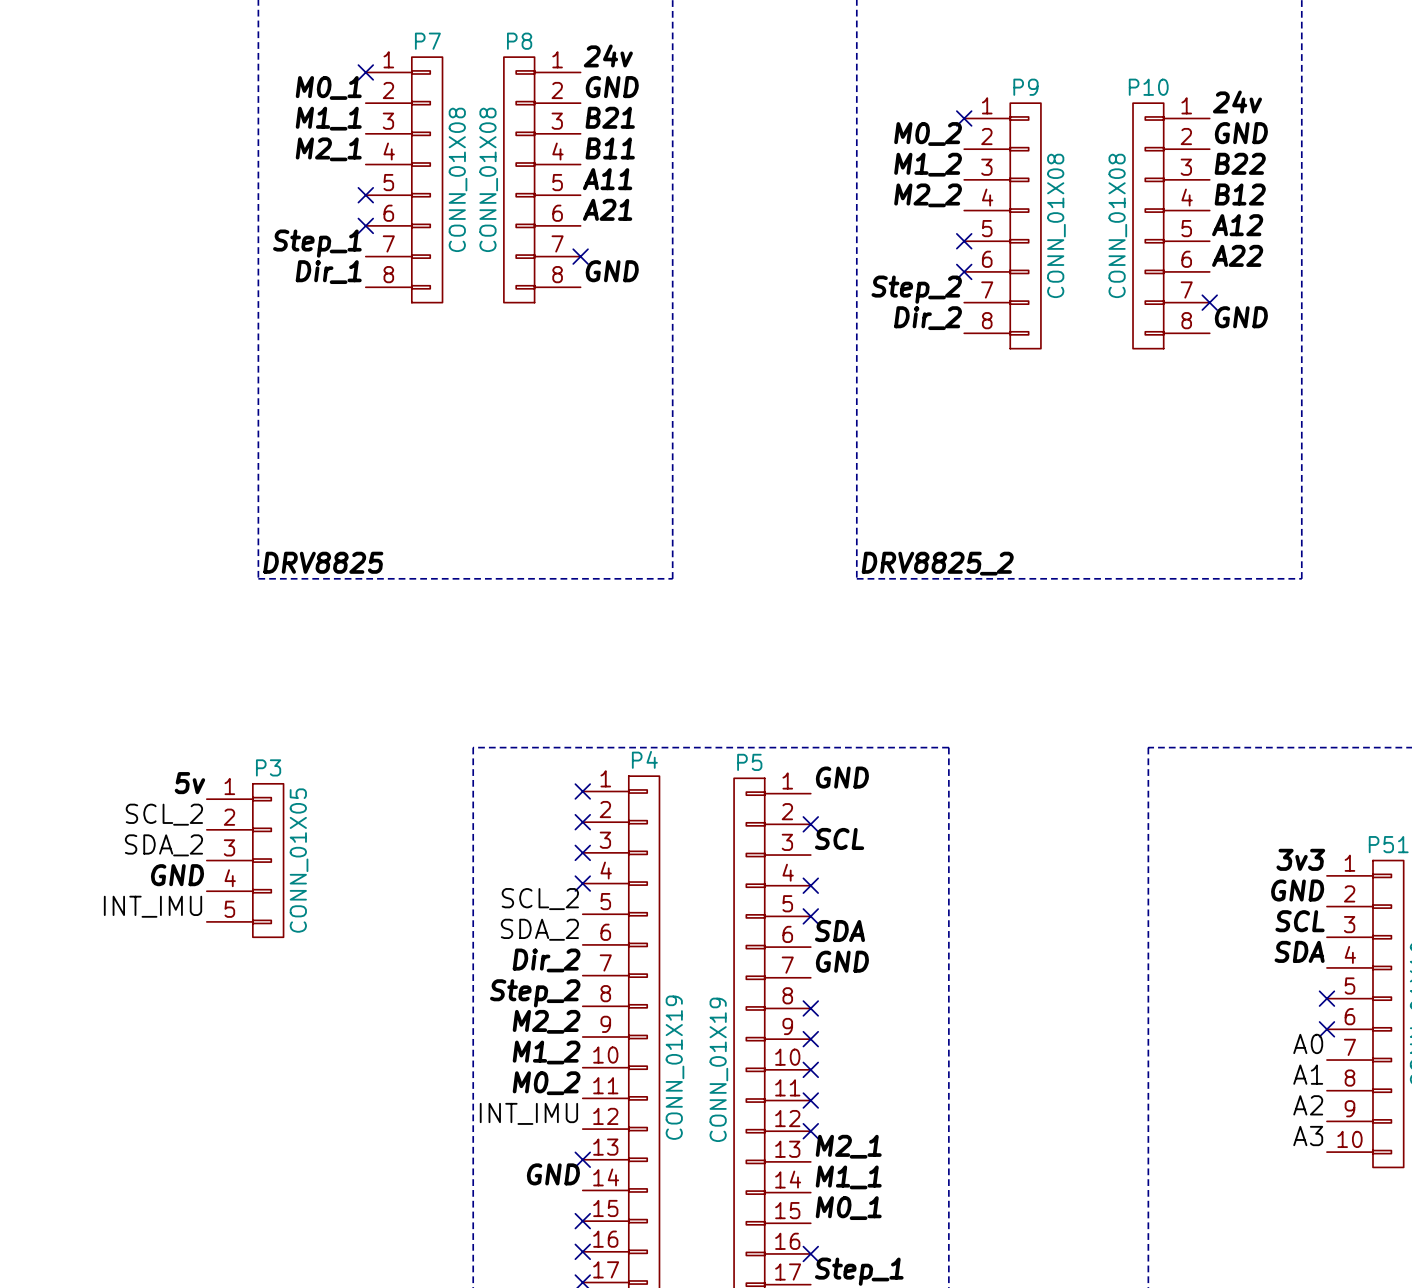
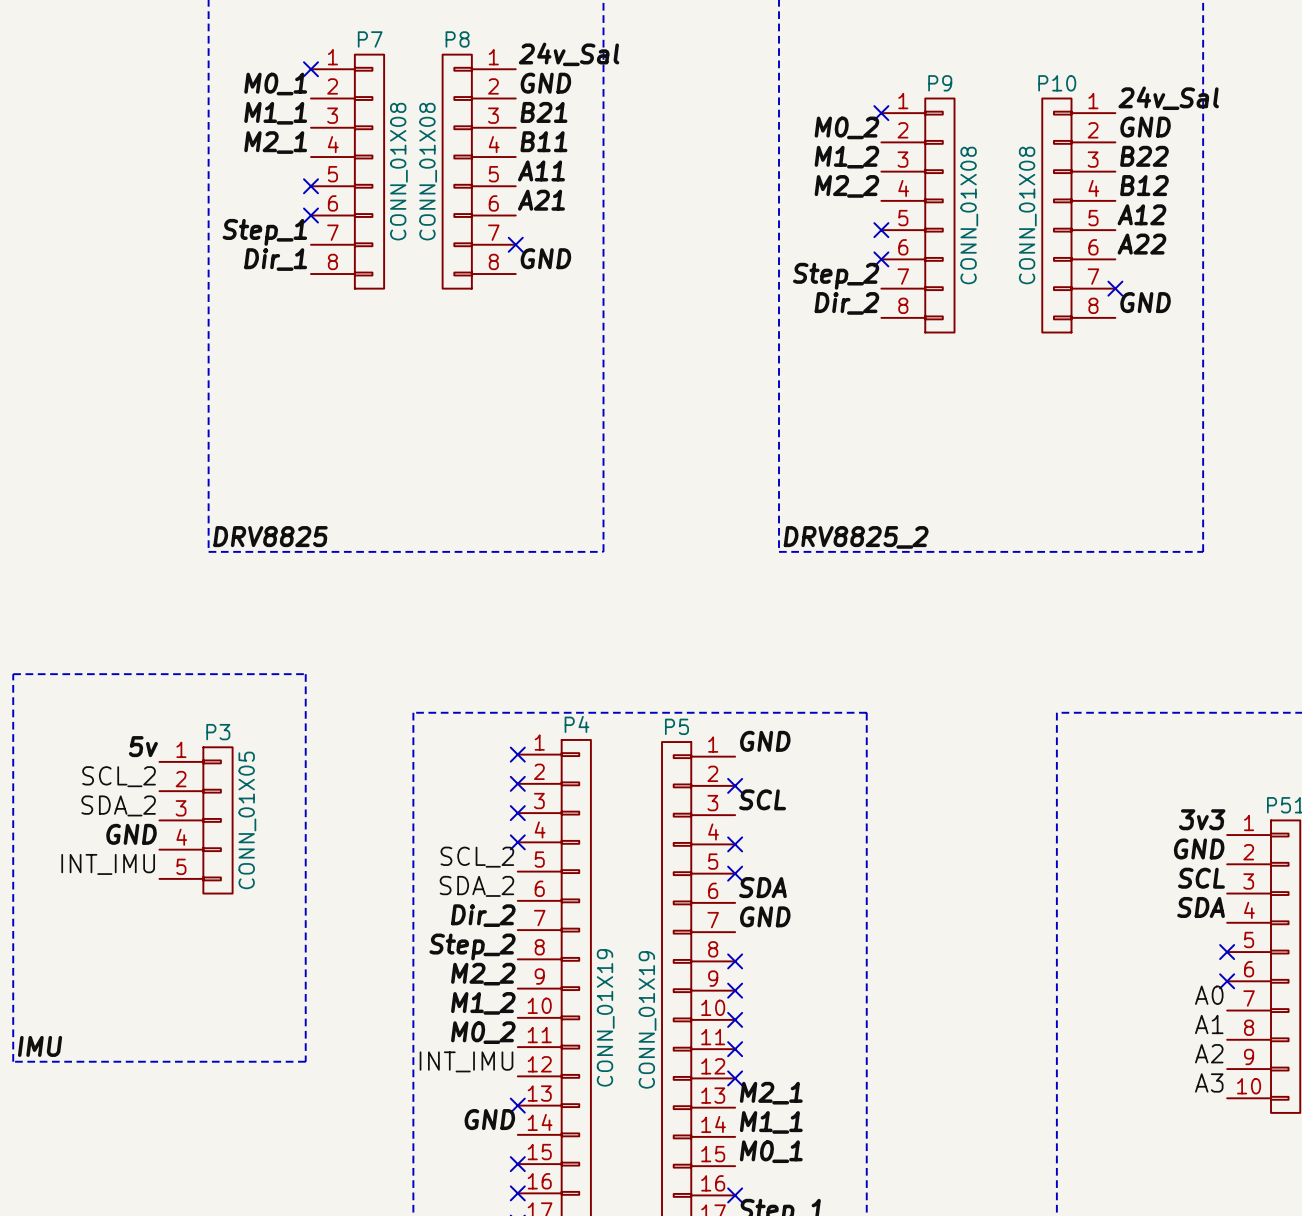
label: 24v (608, 55) -> 24v_Sal (569, 54)
label: 24v (1237, 101) -> 24v_Sal (1168, 98)
line: none -> (13, 674) (305, 674) (305, 1061) (13, 1061) (13, 674)
label: none -> IMU (40, 1046)

